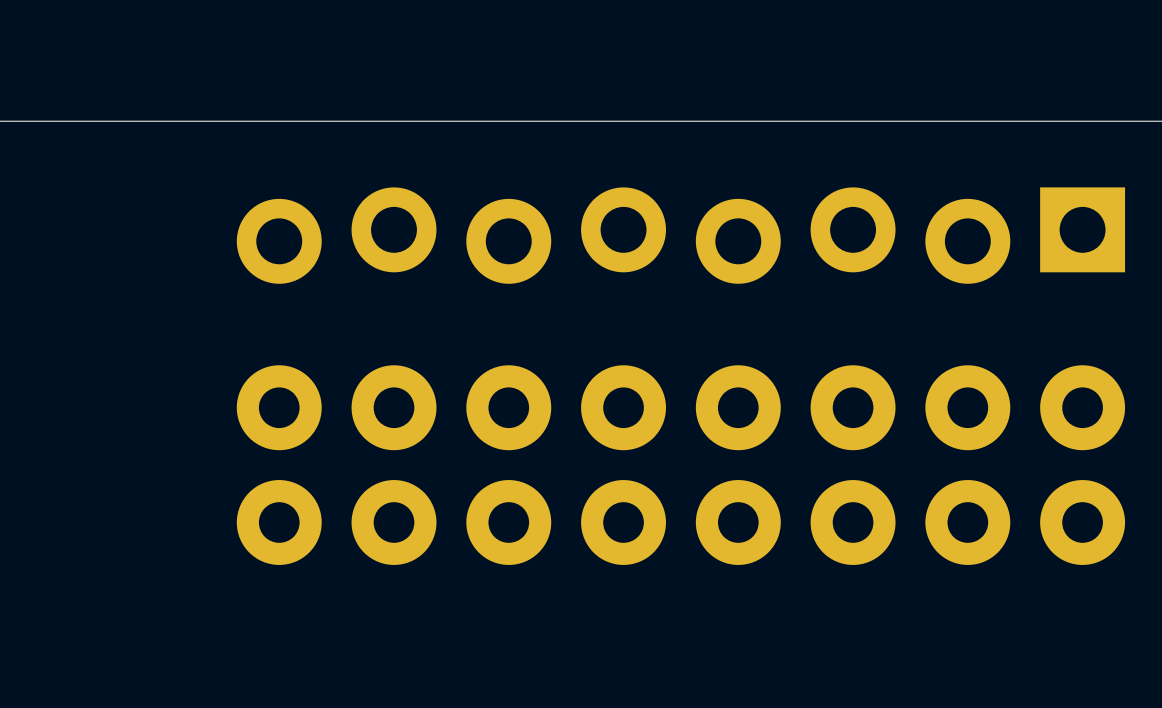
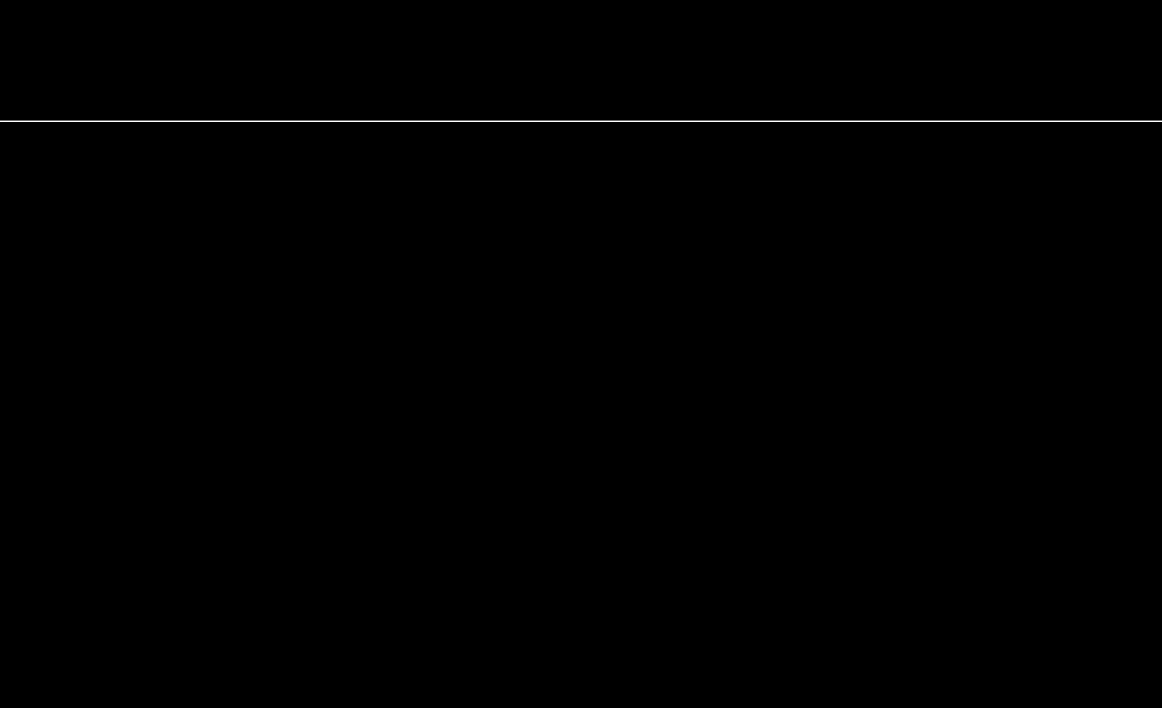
part: (680, 235) -> none
part: (279, 465) -> none
part: (394, 465) -> none
part: (508, 465) -> none
part: (623, 465) -> none
part: (738, 465) -> none
part: (853, 465) -> none
part: (967, 465) -> none
part: (1082, 465) -> none

